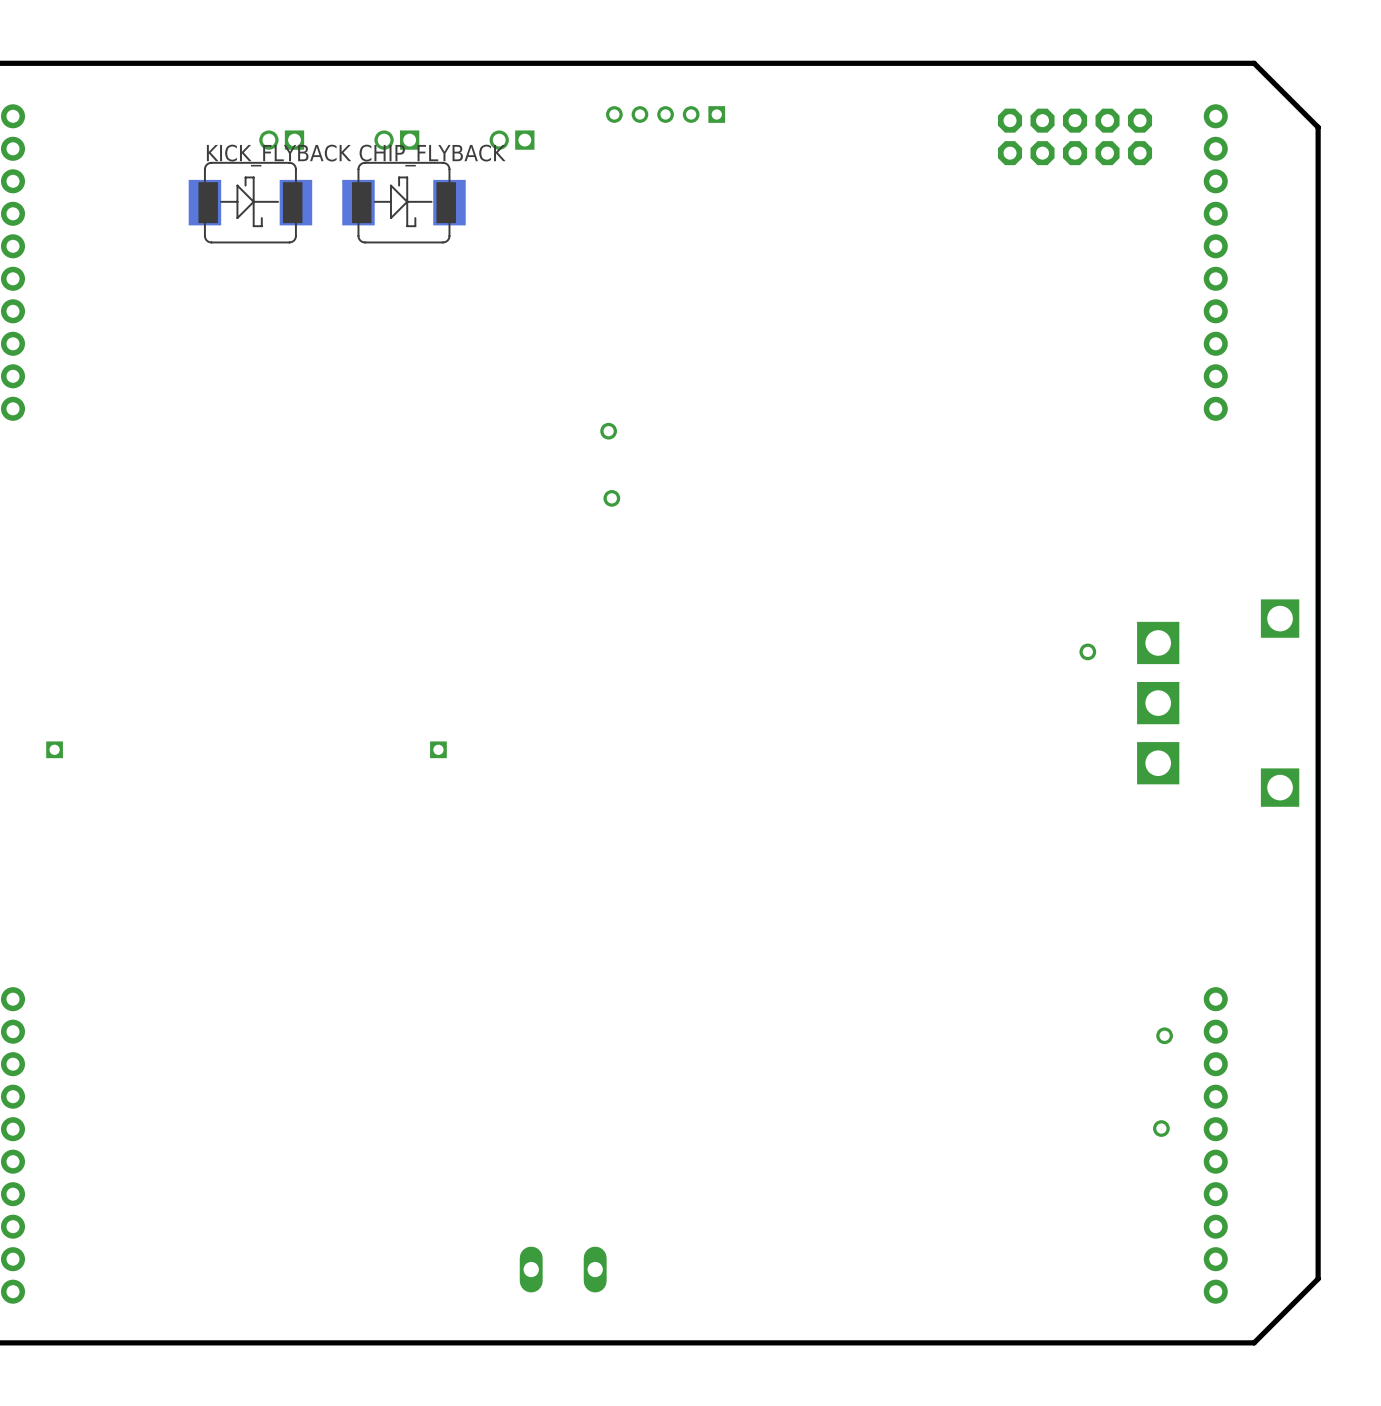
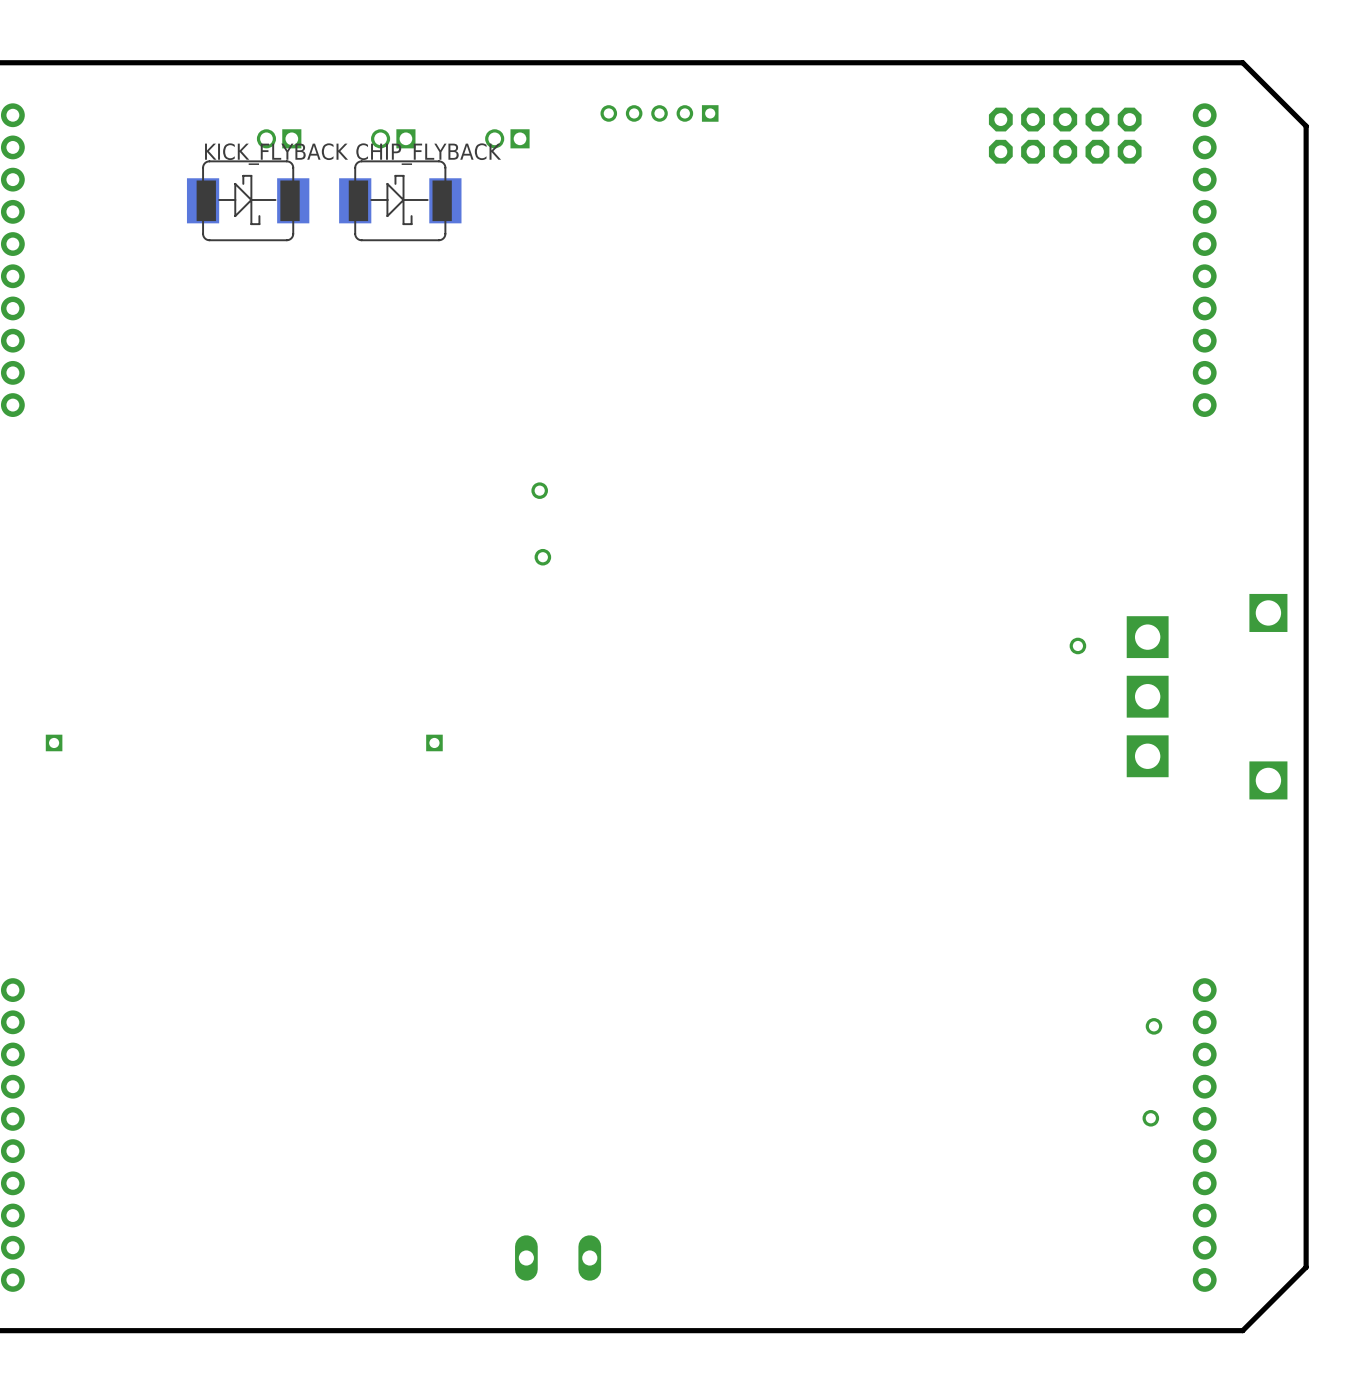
part: (608, 431) -> none
part: none -> (539, 490)
part: (611, 498) -> none
part: none -> (542, 557)

